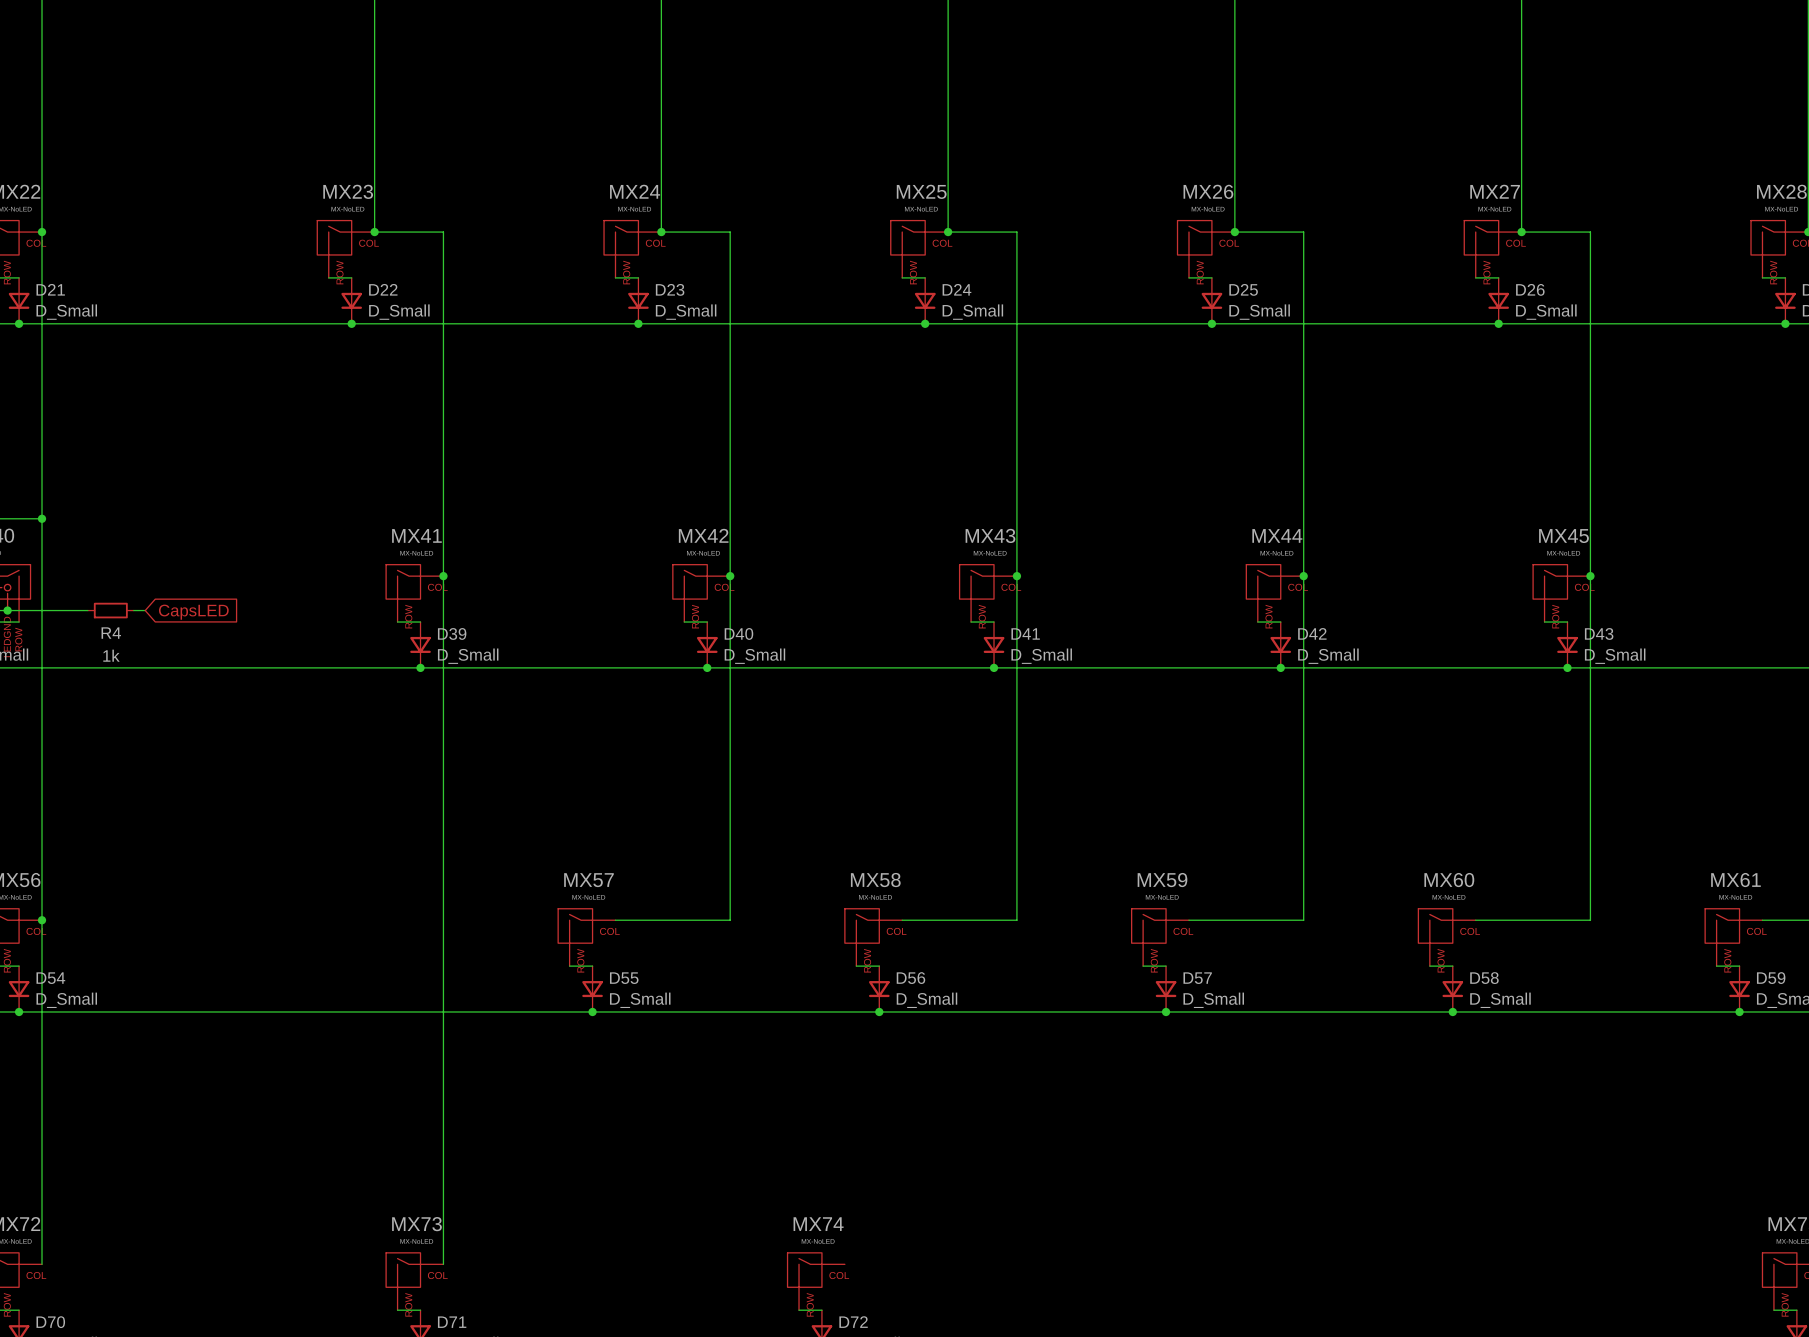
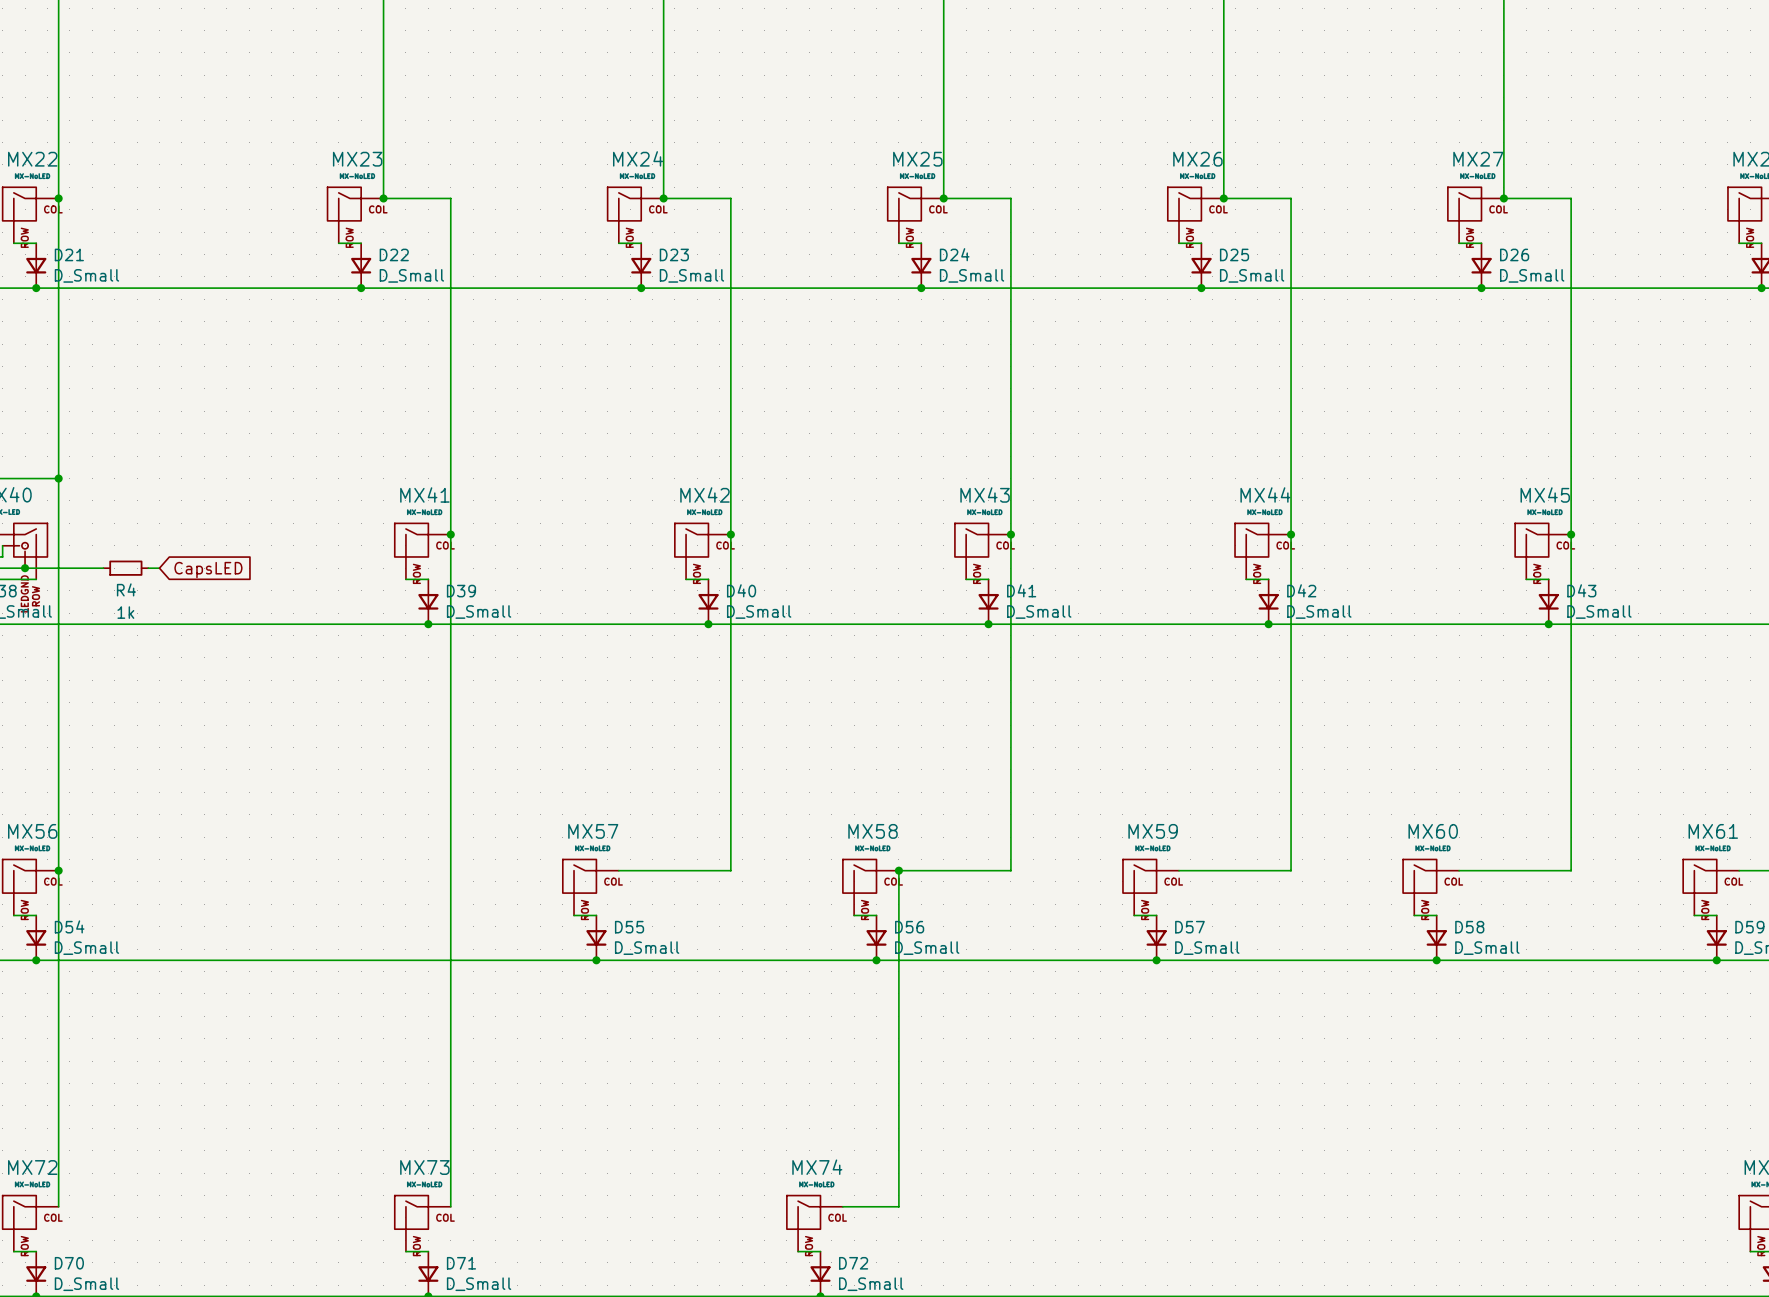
wire: none -> (898, 870) (898, 1206) (842, 1206)
junction: none -> (898, 870)

